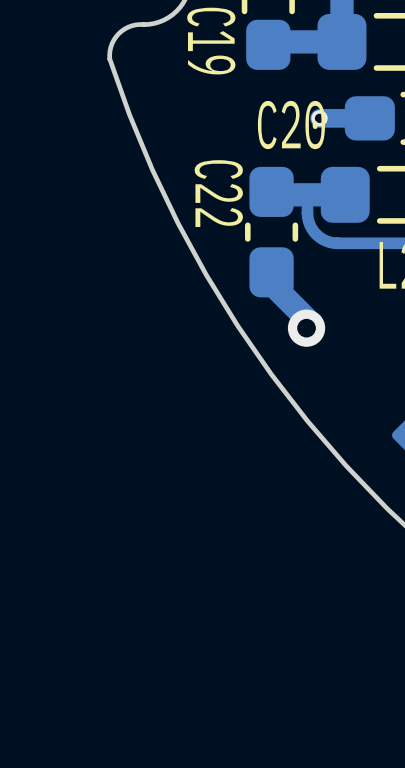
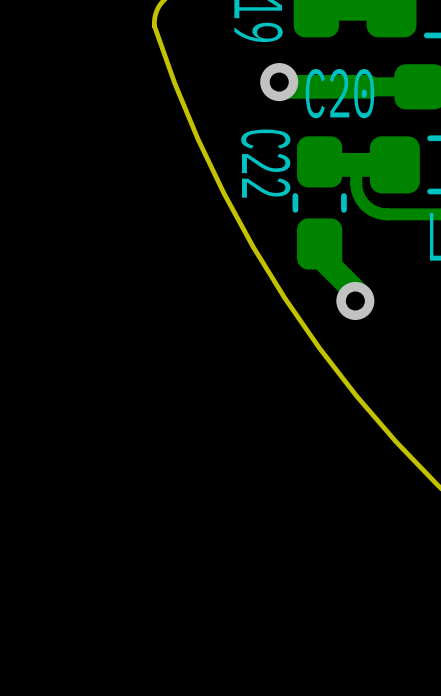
track: none -> (279, 82) (283, 86) (368, 86)
via: none -> (279, 82)
via: (319, 118) -> none

